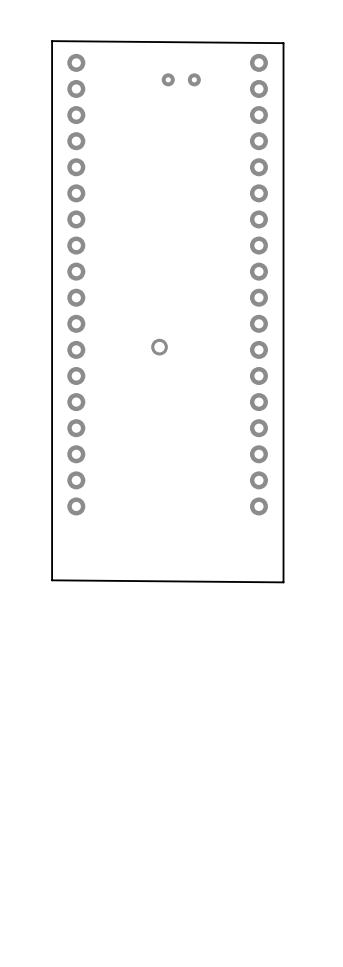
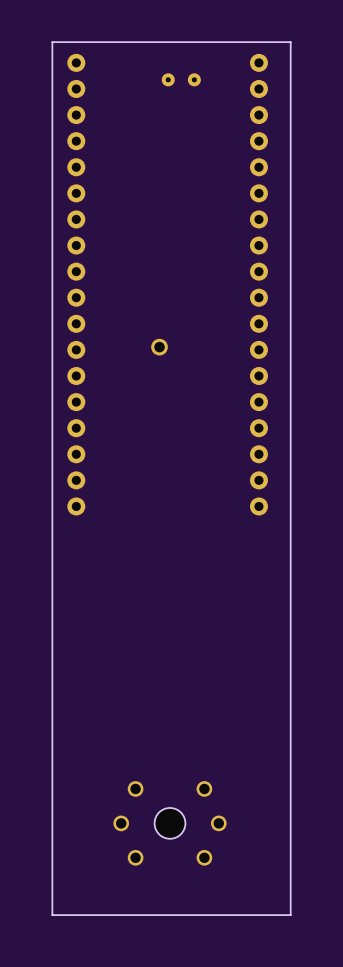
board edge: (52, 41) (52, 580) (283, 582) (283, 43) (52, 41) -> (290, 42) (290, 915) (52, 915) (52, 42) (290, 42)
part: none -> (170, 823)

